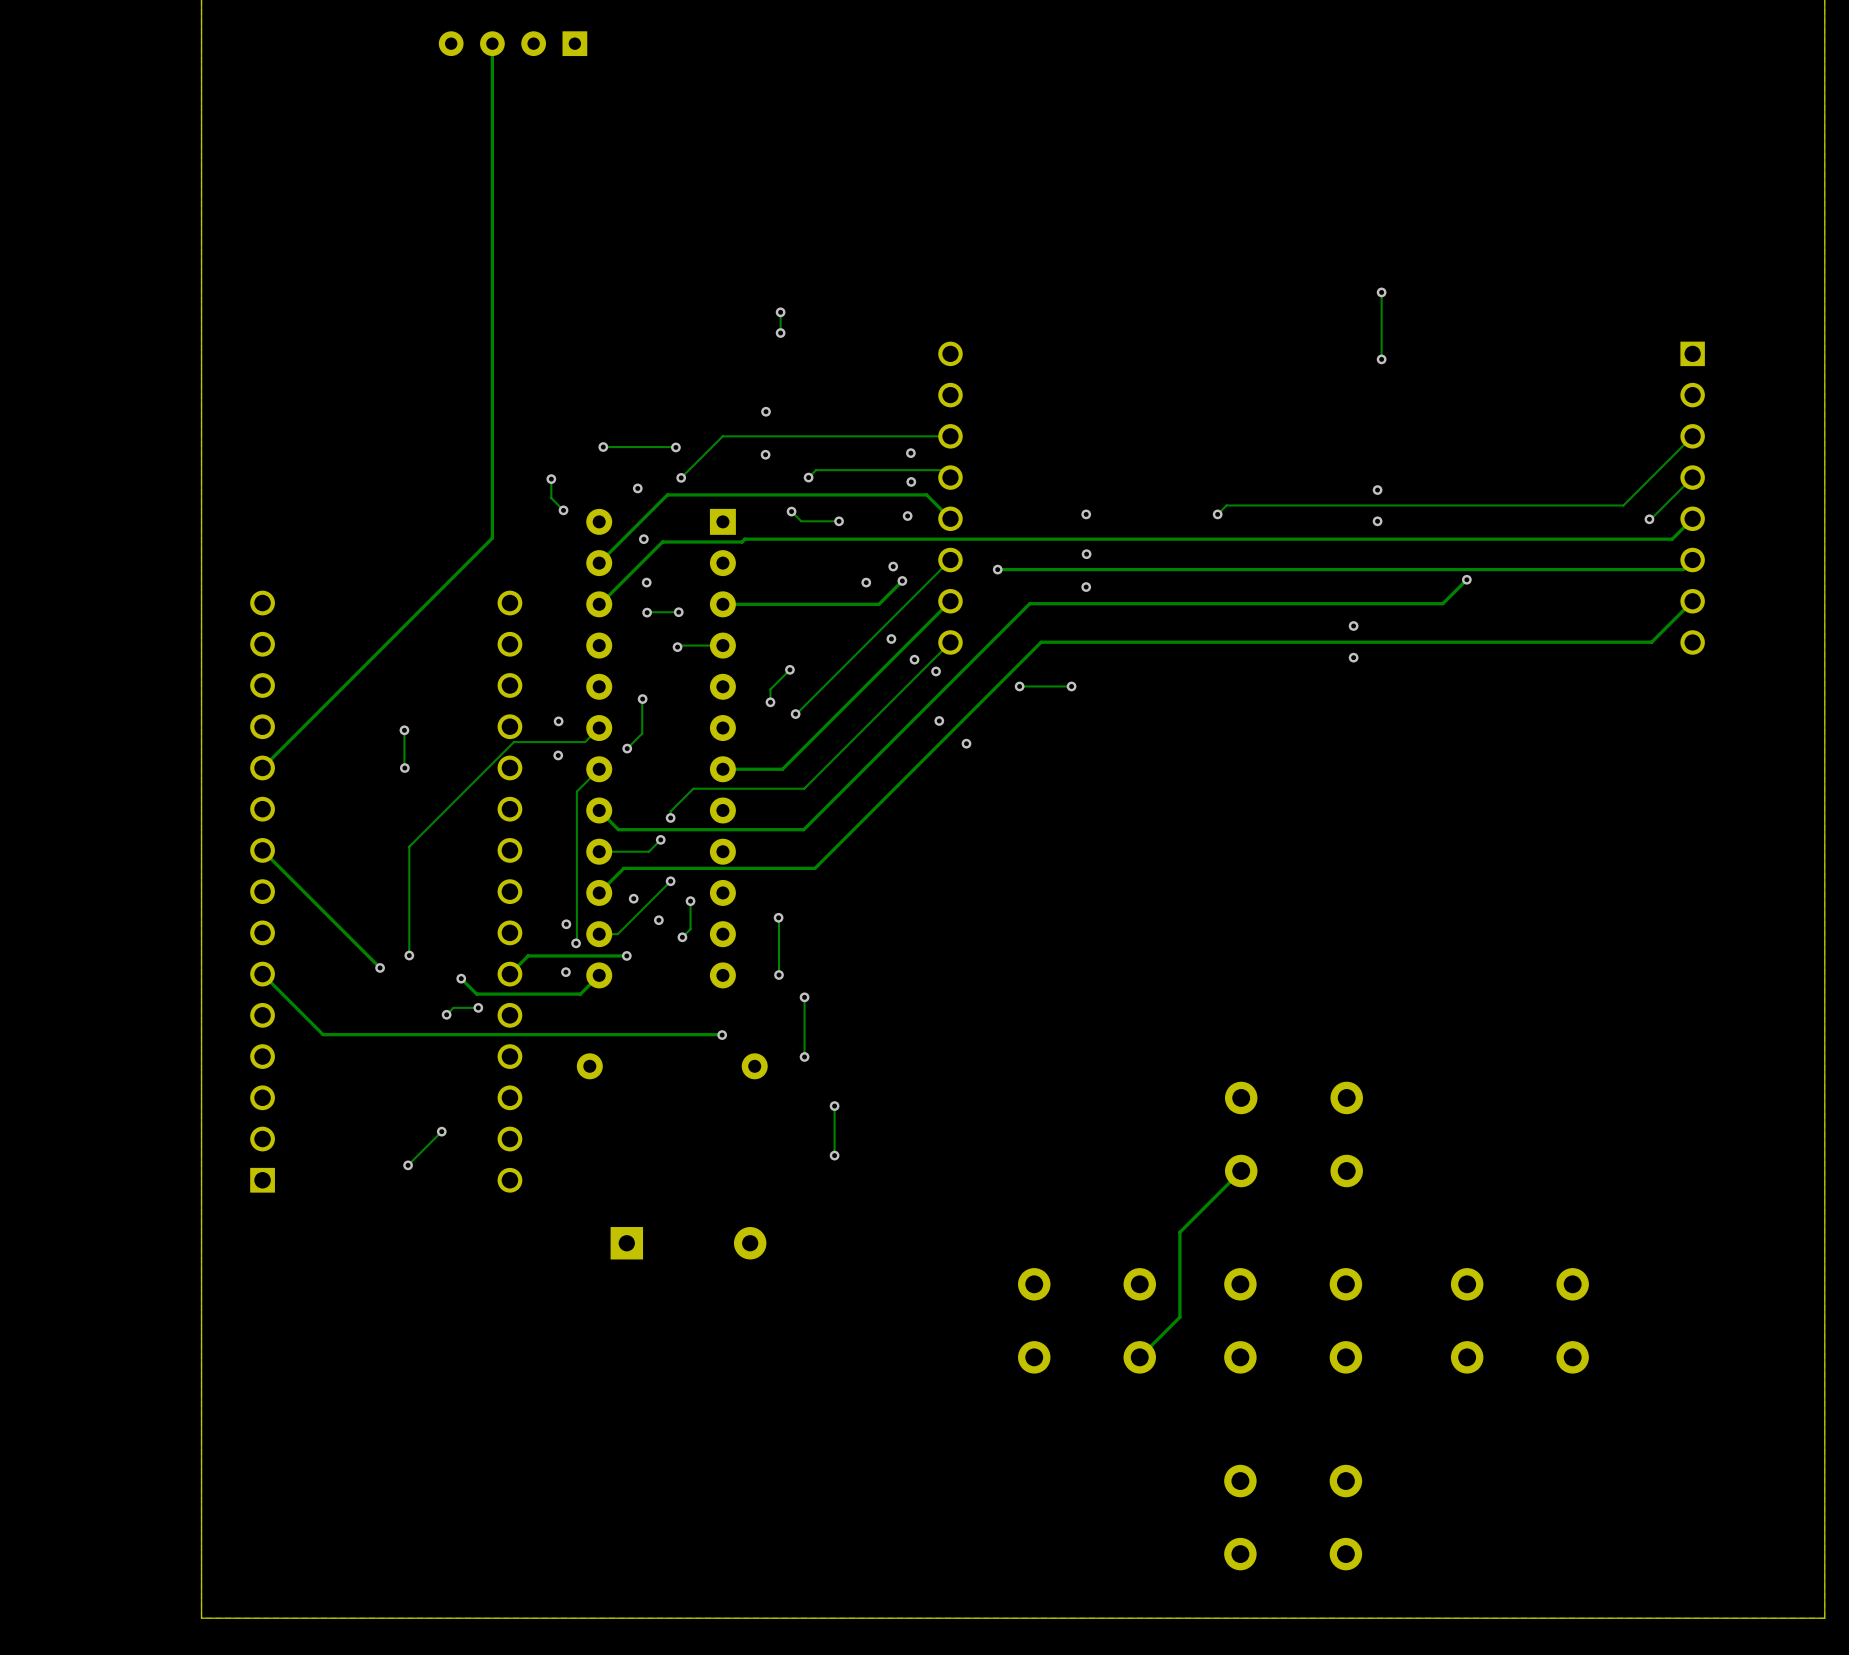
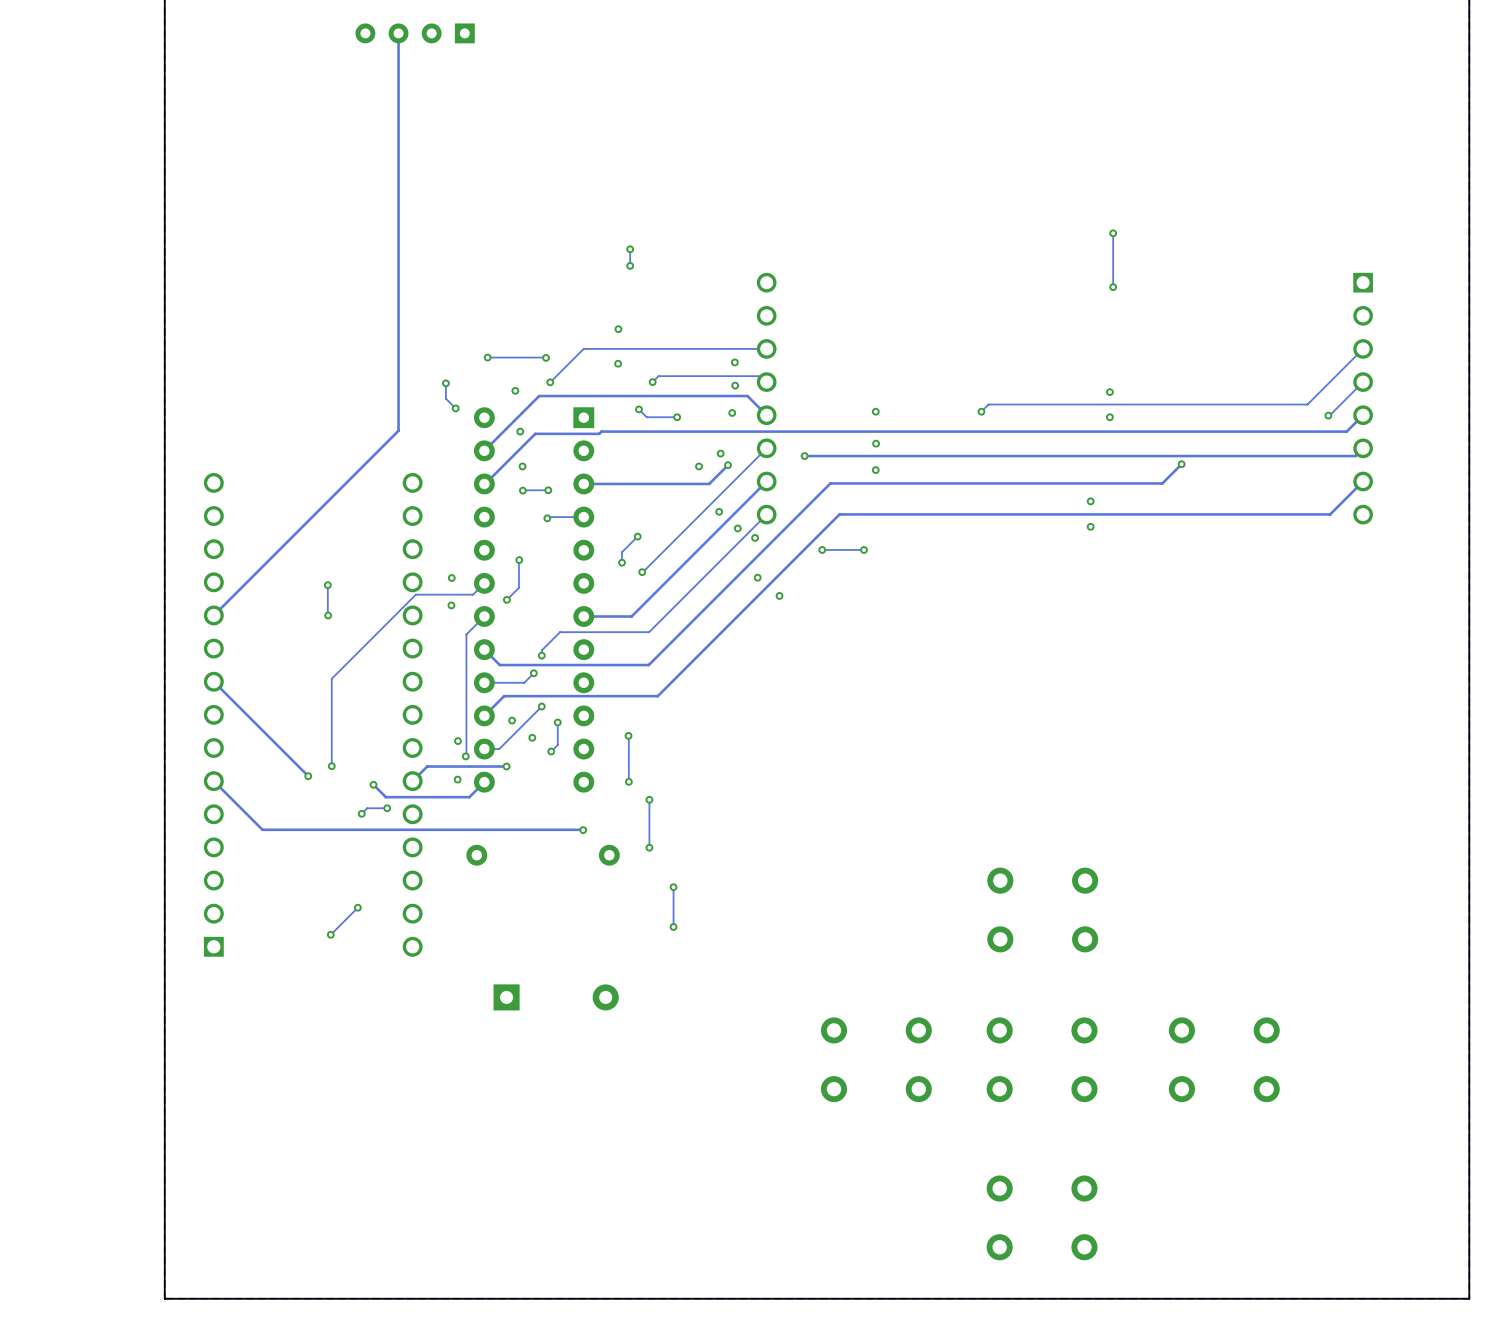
track: (1241, 1171) (1179, 1232) (1179, 1317) (1139, 1357) -> none

